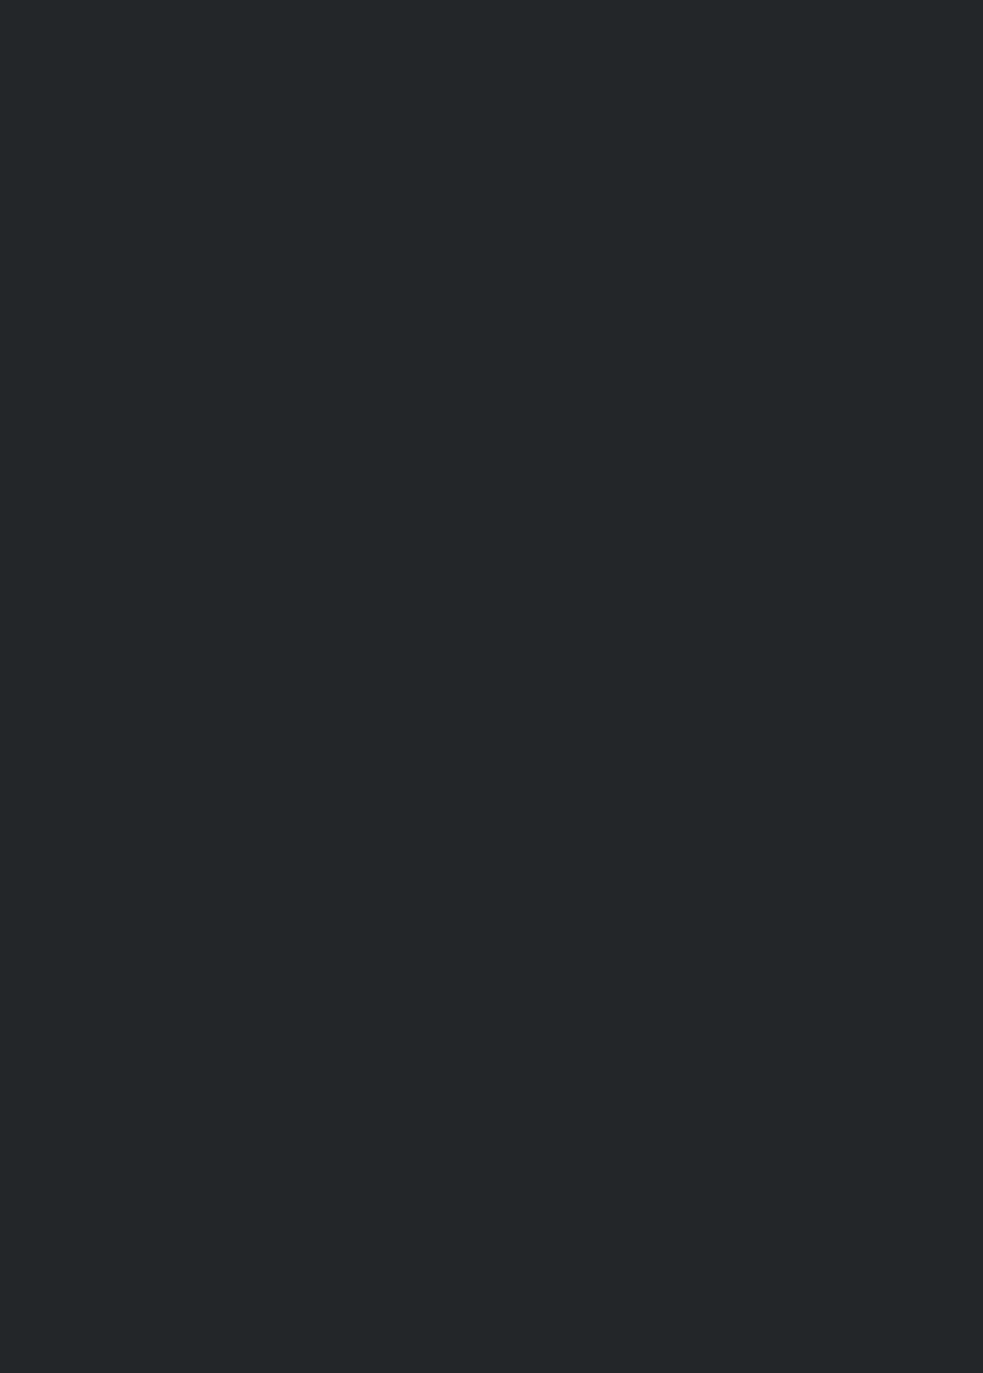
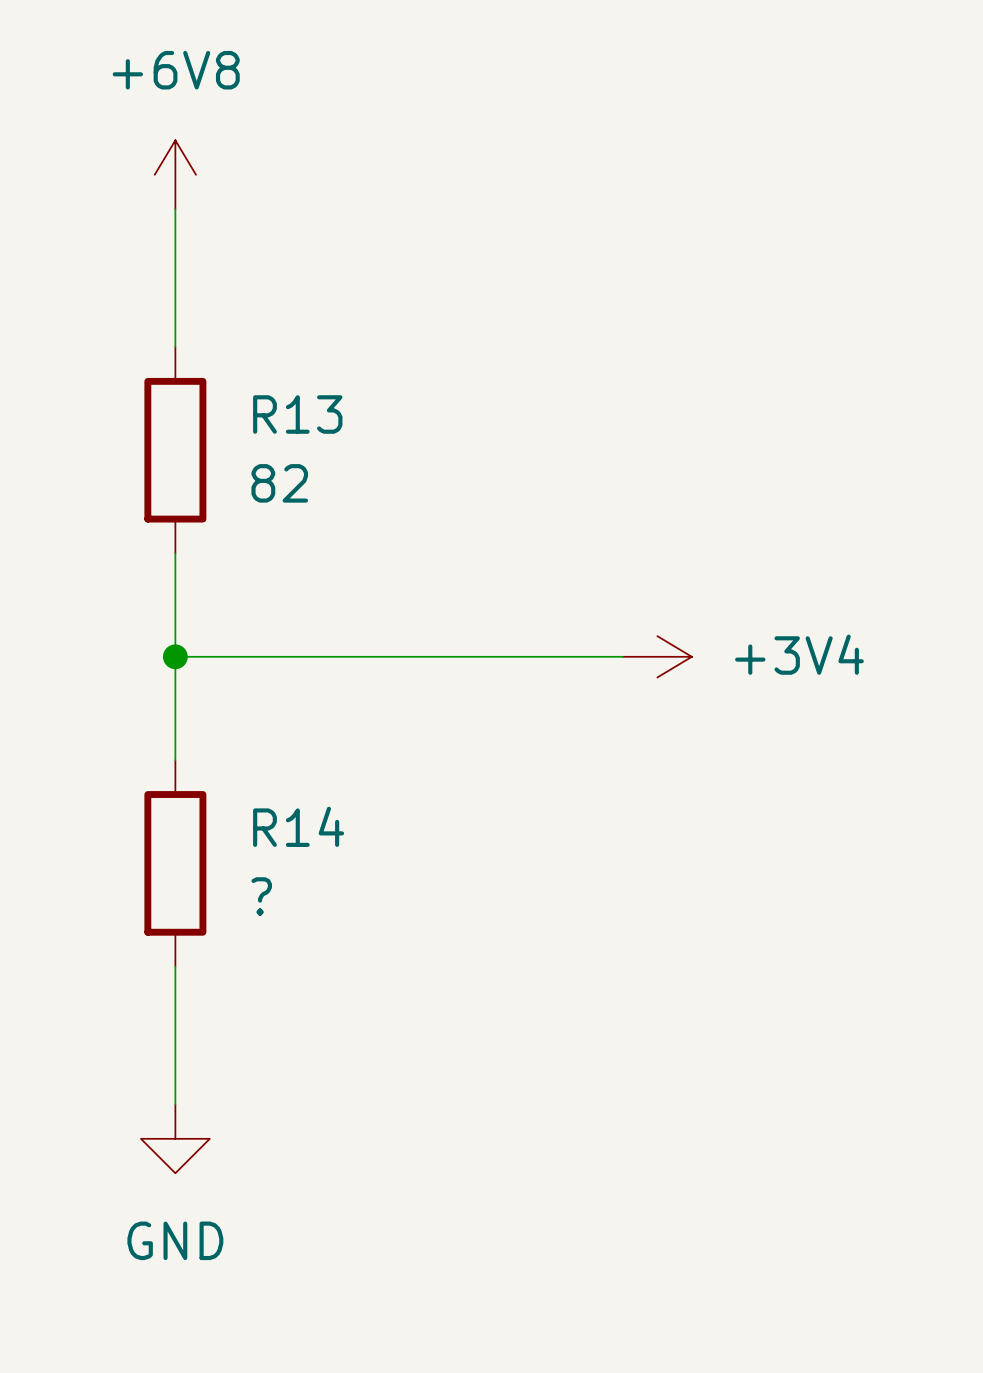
power symbol: none -> +6V8 (175, 174)
wire: none -> (175, 209) (175, 346)
R13: none -> 82 (175, 450)
wire: none -> (175, 553) (175, 760)
wire: none -> (175, 656) (622, 656)
junction: none -> (175, 656)
power symbol: none -> +3V4 (657, 656)
R14: none -> ? (175, 863)
wire: none -> (175, 966) (175, 1104)
power symbol: none -> GND (175, 1138)

